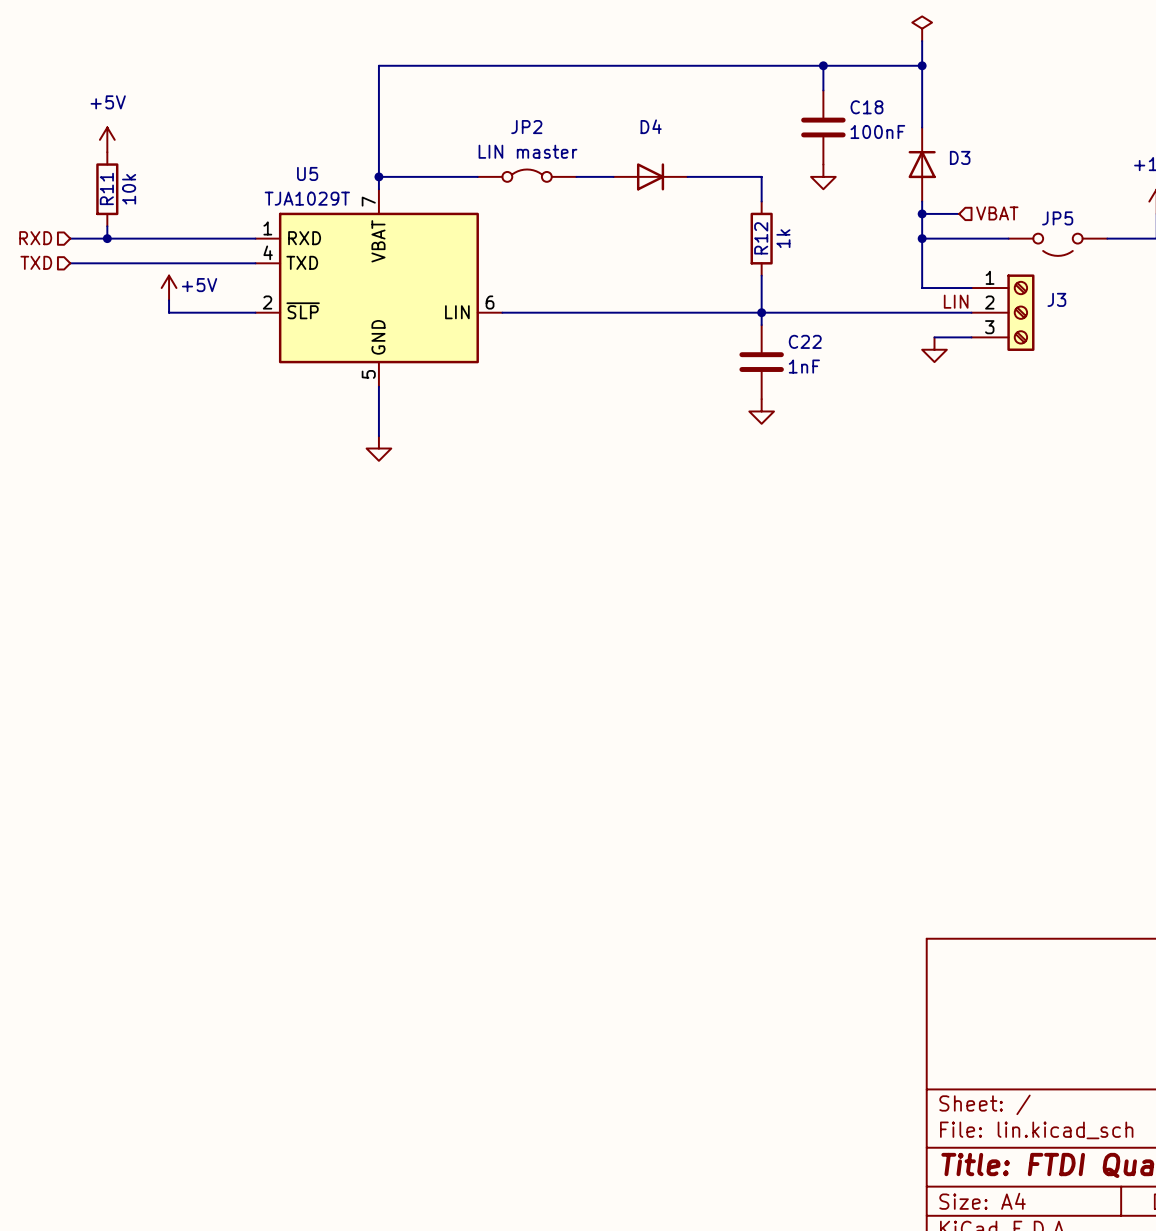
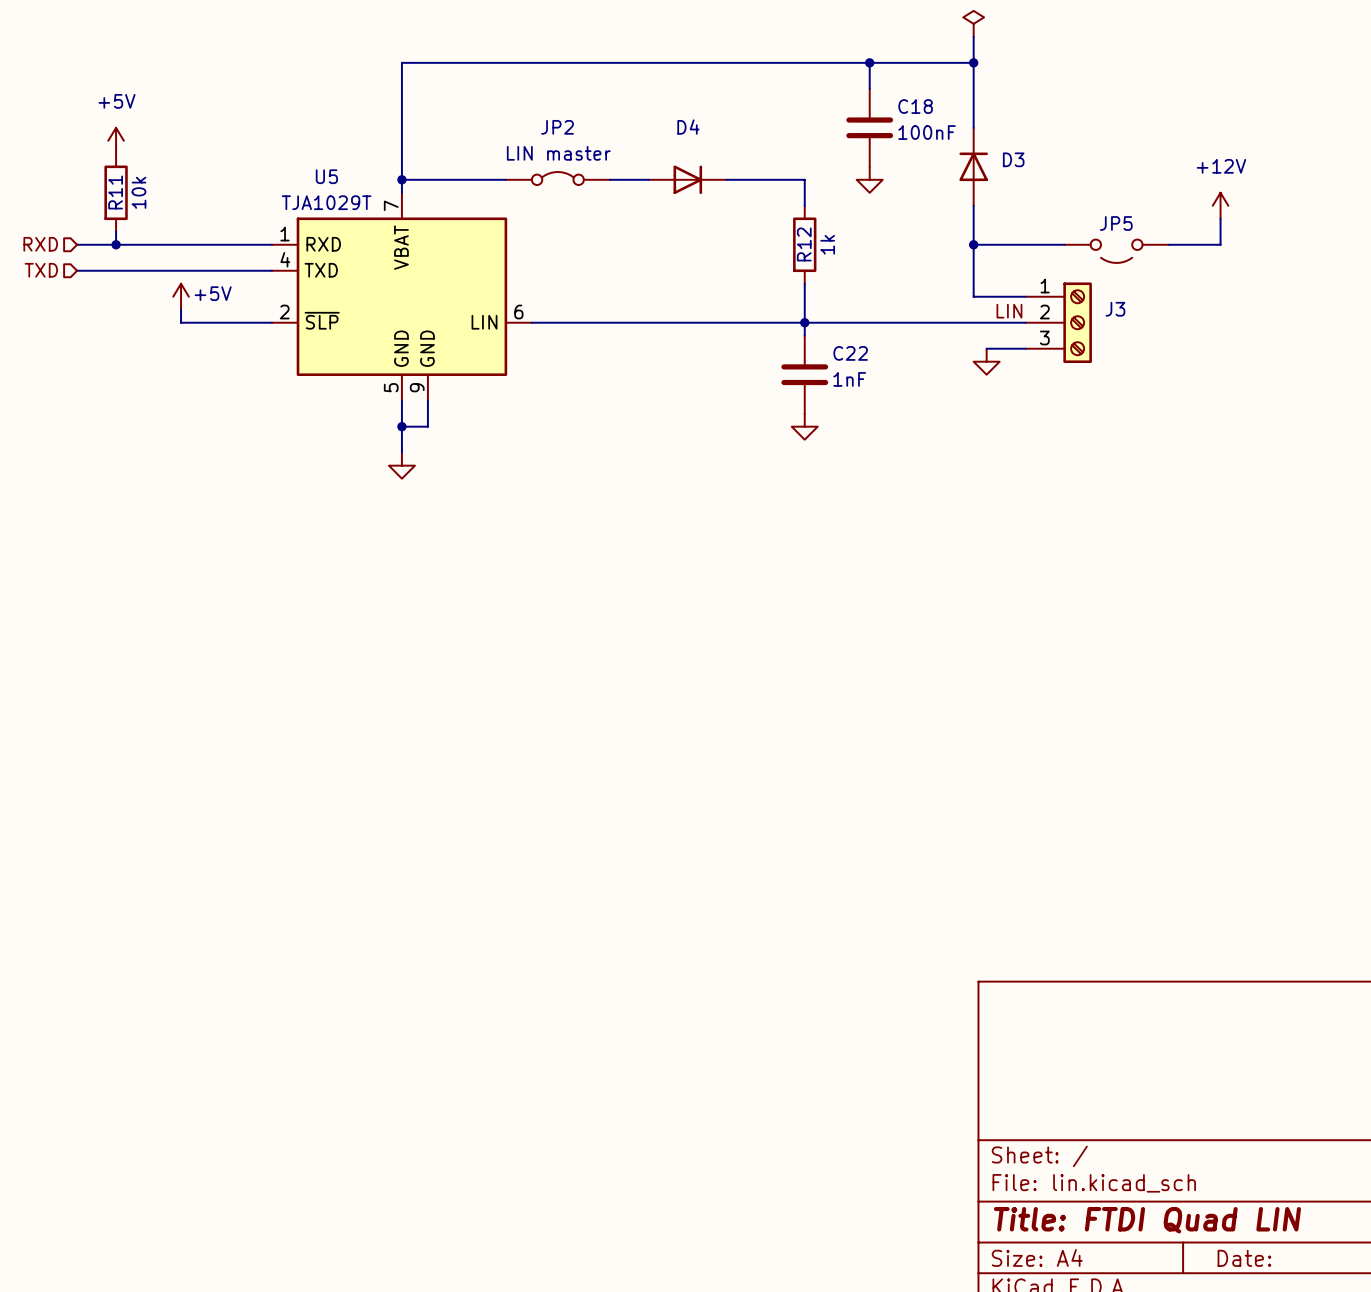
U5 symbol: [255, 189, 503, 387] -> [272, 192, 532, 401]
wire: (922, 213) (959, 213) -> none
junction: (922, 213) -> none
hierarchical label: VBAT (997, 213) -> none
wire: none -> (427, 400) (427, 426) (401, 426)
junction: none -> (401, 426)

